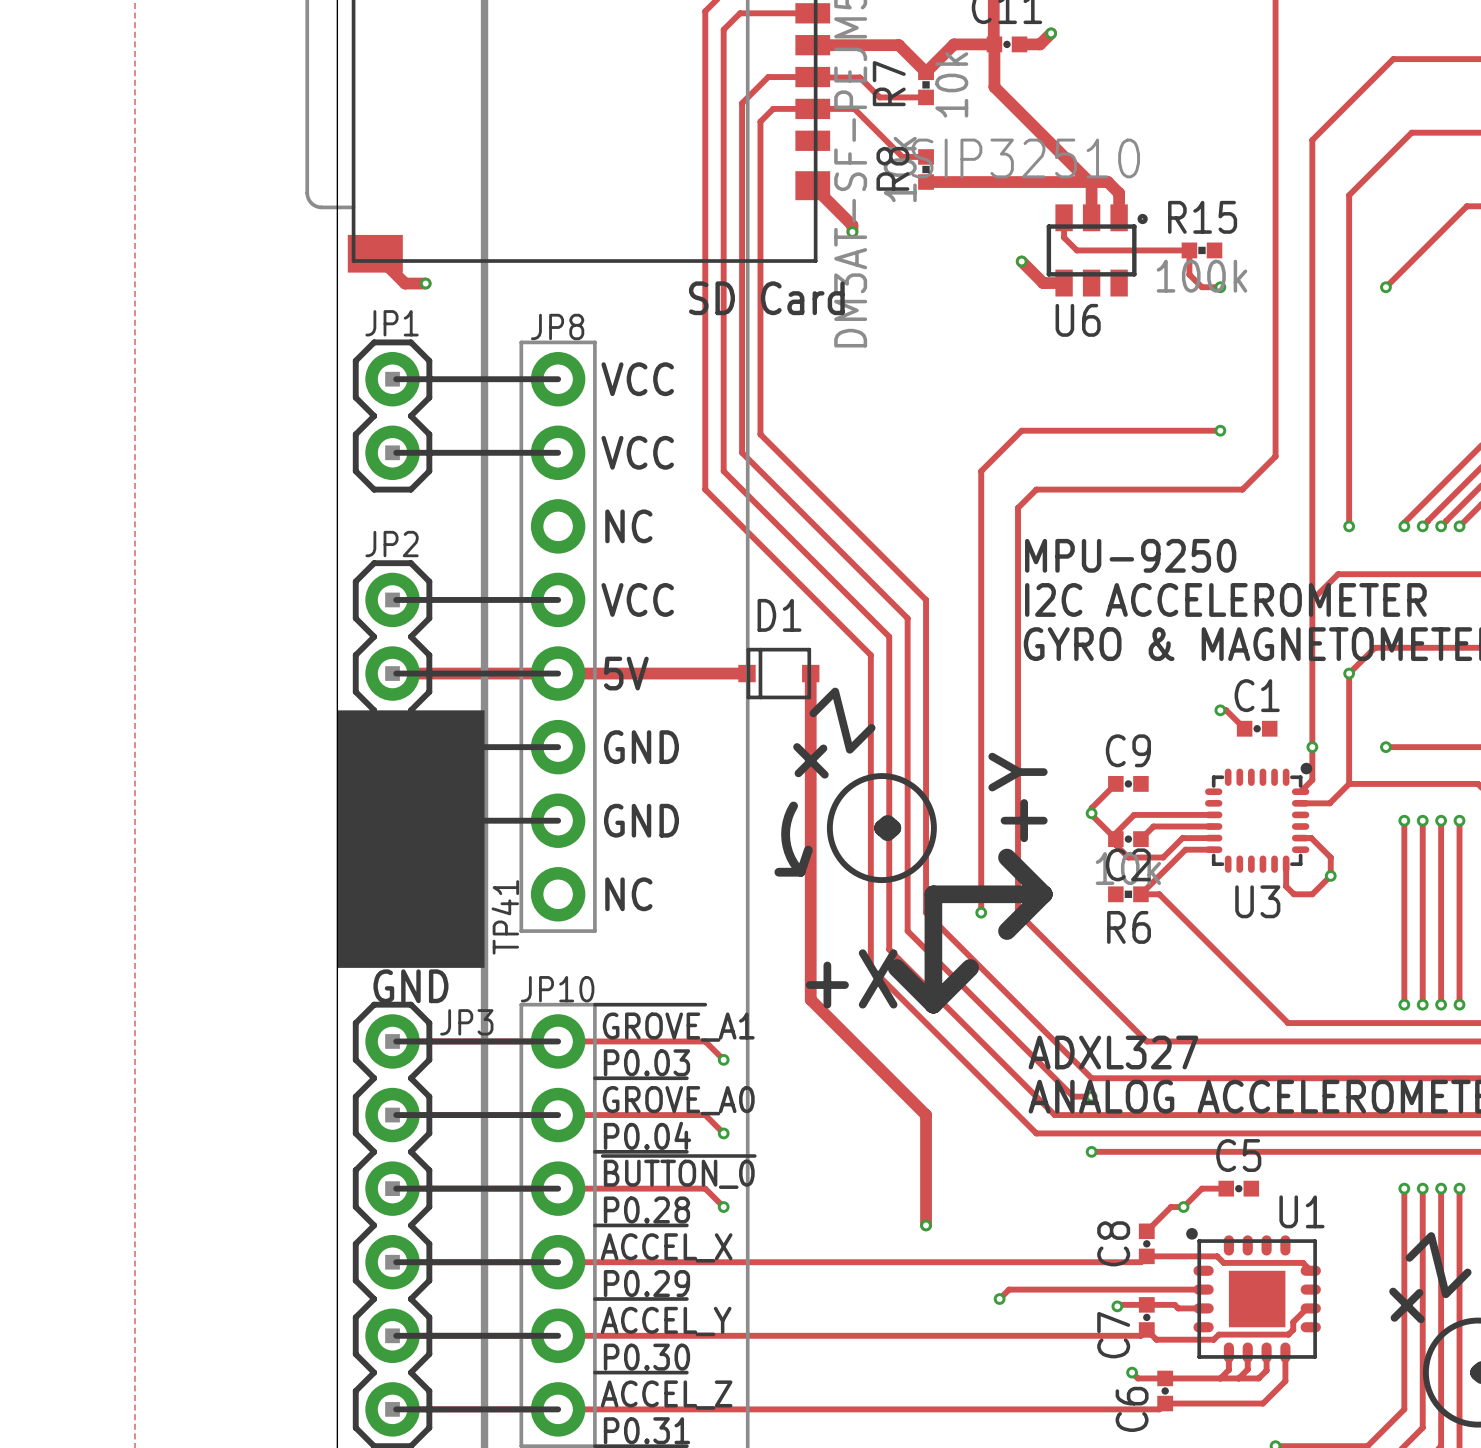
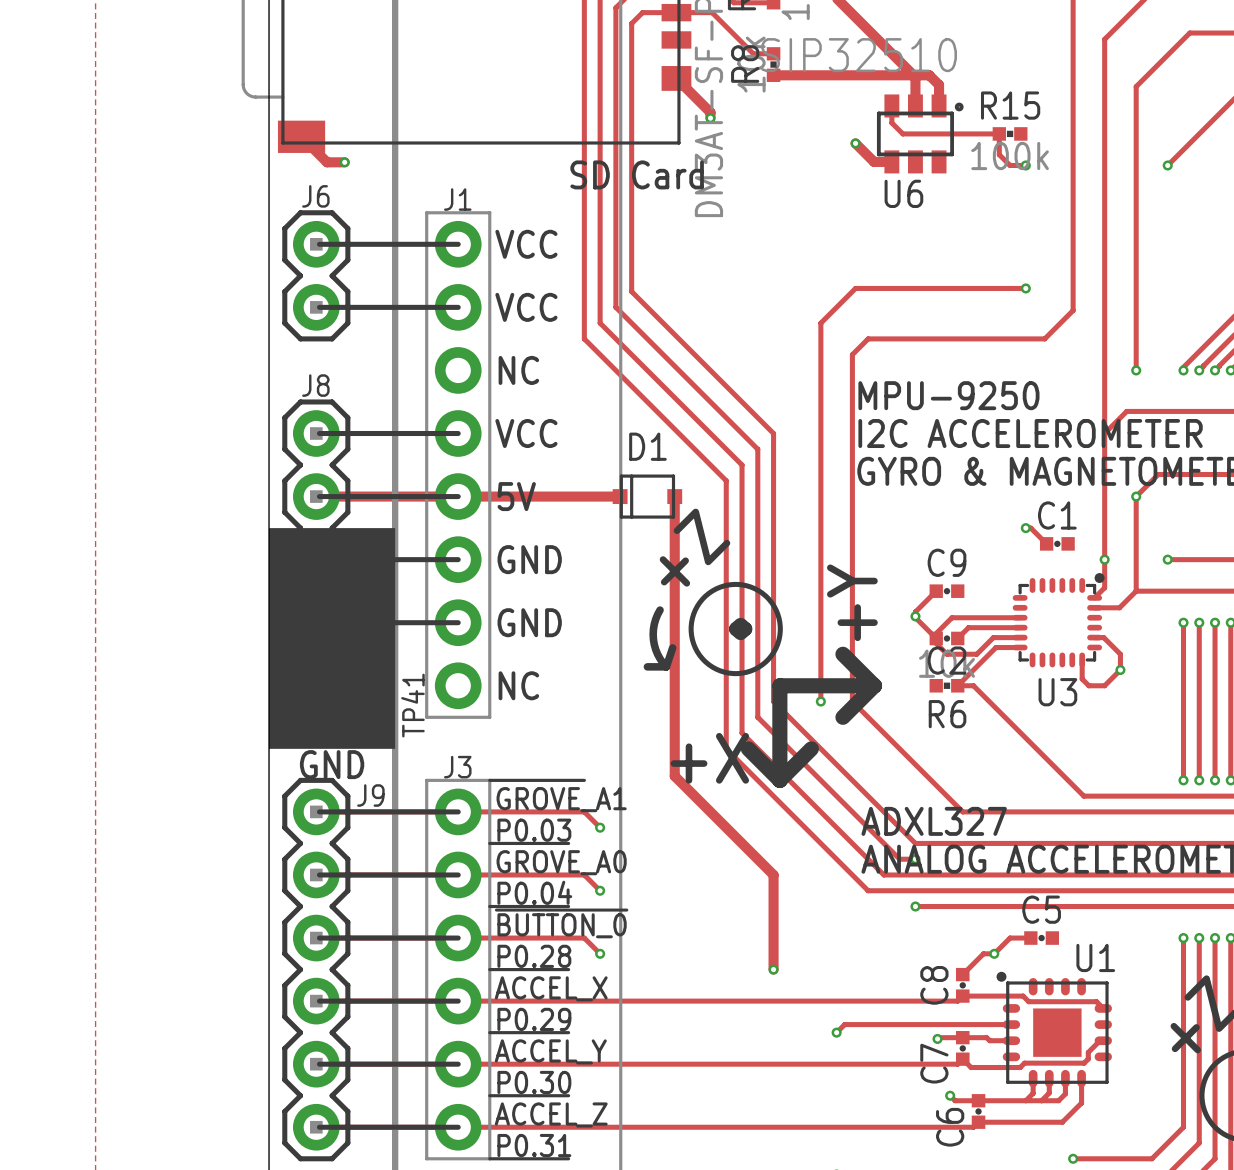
JP1 name: JP1 (392, 323) -> J6 (315, 196)
text: JP8 (557, 326) -> J1 (457, 199)
JP2 name: JP2 (392, 544) -> J8 (315, 385)
text: JP10 (557, 989) -> J3 (457, 767)
JP3 name: JP3 (466, 1022) -> J9 (370, 795)

